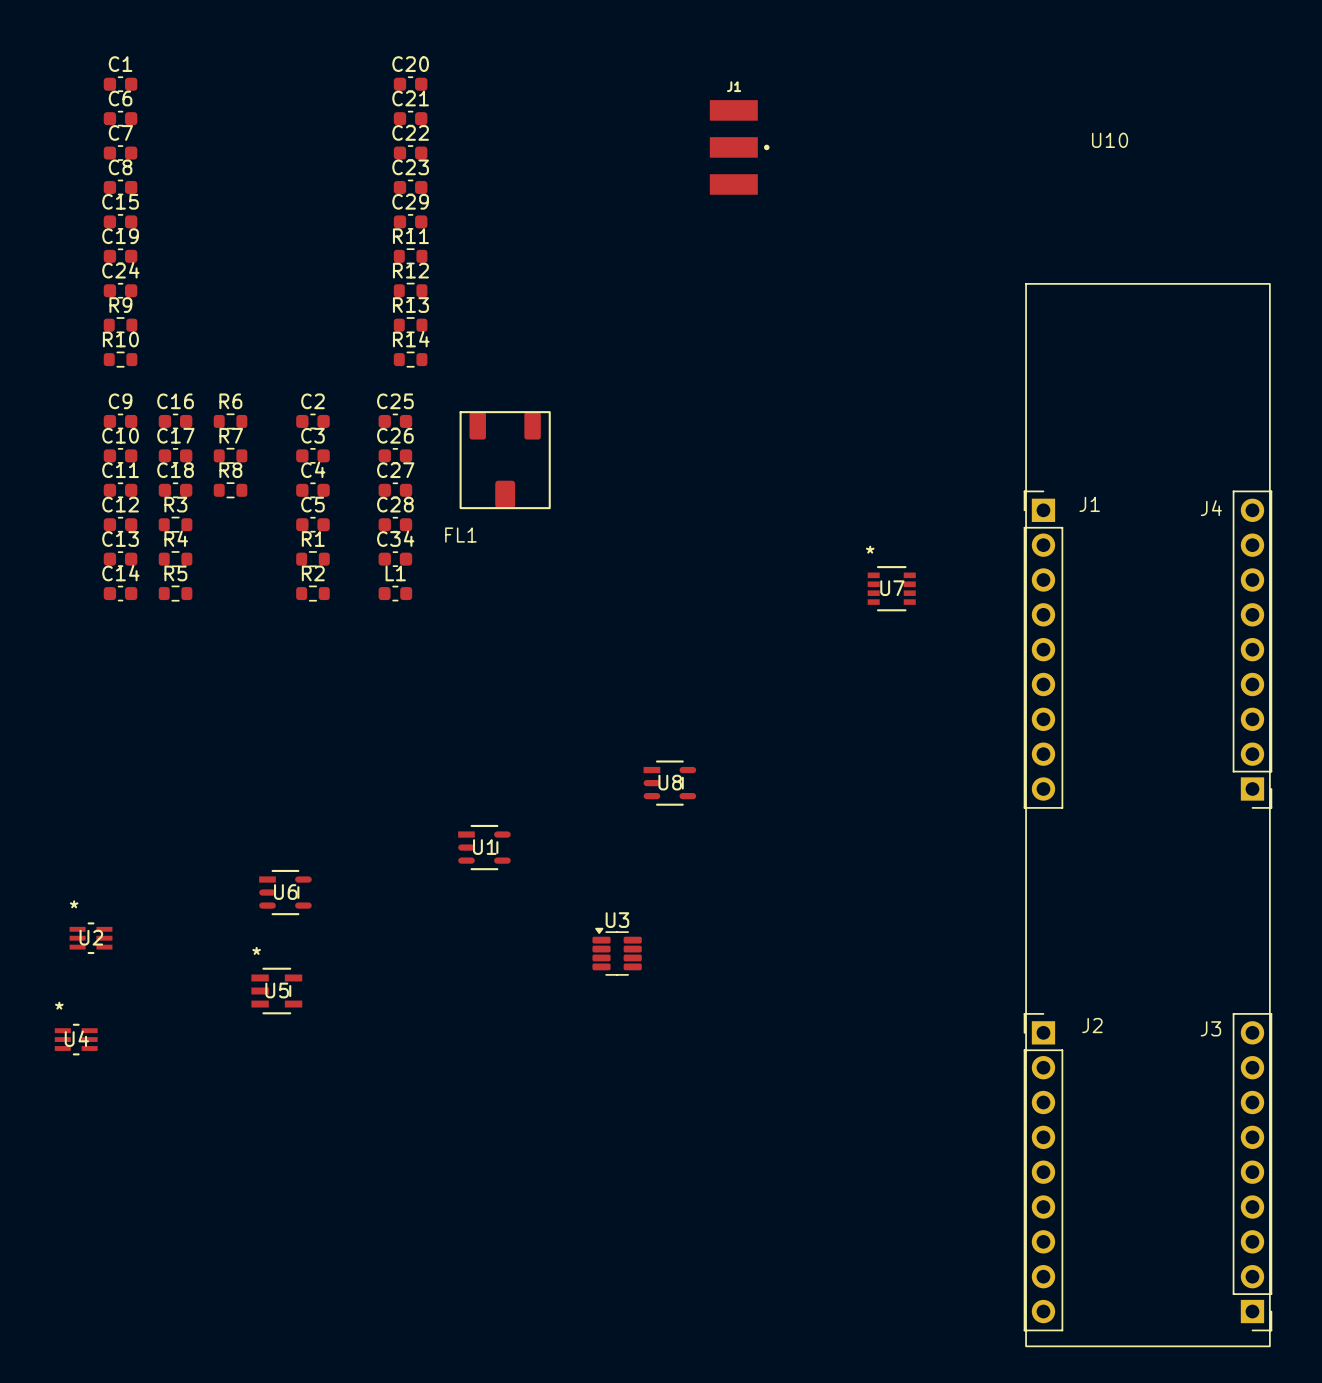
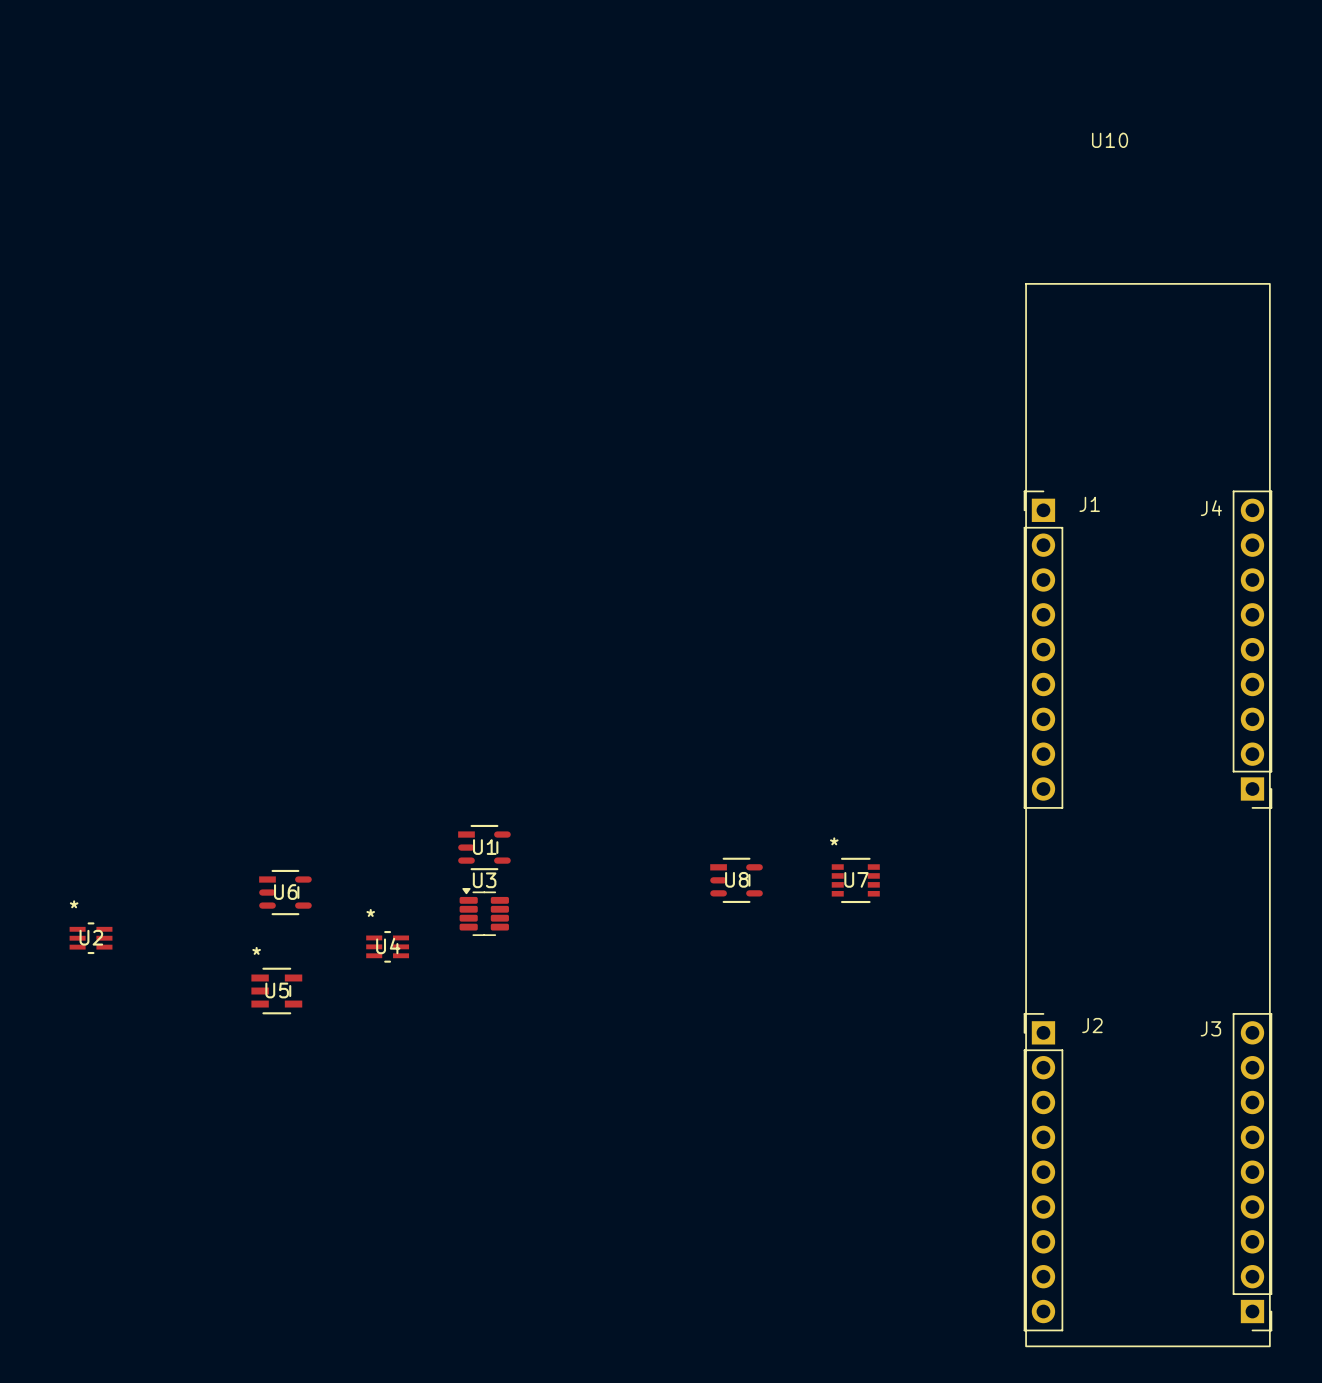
C1: (120, 84) -> none
C20: (410, 84) -> none
C6: (120, 118) -> none
C21: (410, 118) -> none
J1: (739, 147) -> none
C7: (120, 153) -> none
C22: (410, 153) -> none
C8: (120, 187) -> none
C23: (410, 187) -> none
C15: (120, 221) -> none
C29: (410, 221) -> none
C19: (120, 256) -> none
R11: (410, 256) -> none
C24: (120, 290) -> none
R12: (410, 290) -> none
R9: (120, 325) -> none
R13: (410, 325) -> none
R10: (120, 359) -> none
R14: (410, 359) -> none
C9: (120, 421) -> none
C16: (175, 421) -> none
R6: (230, 421) -> none
C2: (312, 421) -> none
C25: (395, 421) -> none
C10: (120, 455) -> none
C17: (175, 455) -> none
R7: (230, 455) -> none
C3: (312, 455) -> none
C26: (395, 455) -> none
FL1: (505, 460) -> none
C11: (120, 490) -> none
C18: (175, 490) -> none
R8: (230, 490) -> none
C4: (312, 490) -> none
C27: (395, 490) -> none
C12: (120, 524) -> none
R3: (175, 524) -> none
C5: (312, 524) -> none
C28: (395, 524) -> none
C13: (120, 559) -> none
R4: (175, 559) -> none
R1: (312, 559) -> none
C34: (395, 559) -> none
U7 position: (891, 588) -> (855, 880)
C14: (120, 593) -> none
R5: (175, 593) -> none
R2: (312, 593) -> none
L1: (395, 593) -> none
U8 position: (669, 783) -> (736, 880)
U3 position: (617, 951) -> (484, 911)
U4 position: (76, 1039) -> (387, 946)

